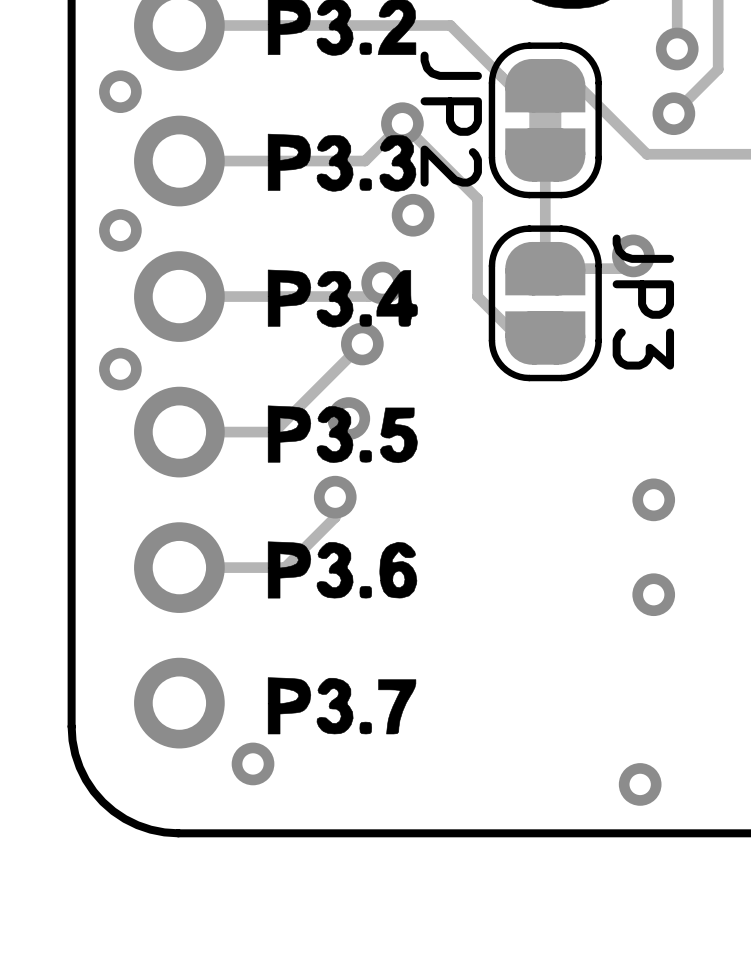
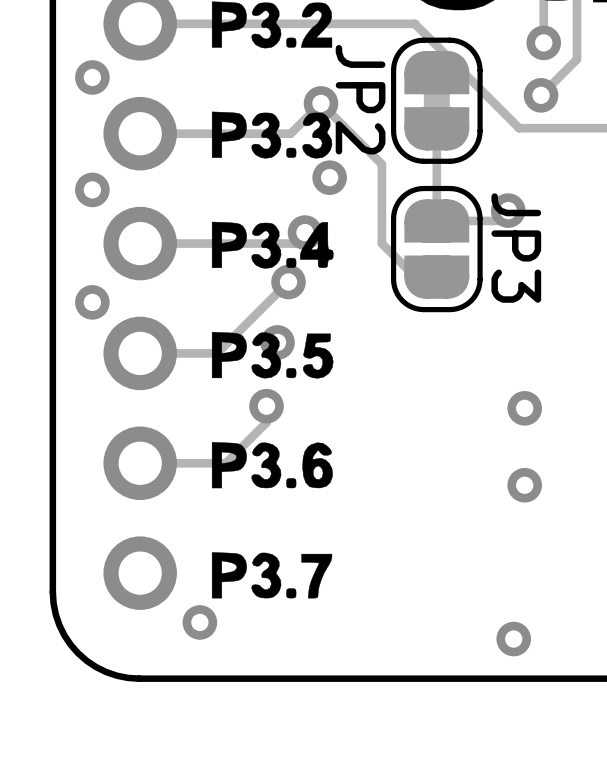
track: (450, 25) (511, 86) (579, 86) -> (359, 23) (414, 23) (464, 73)

